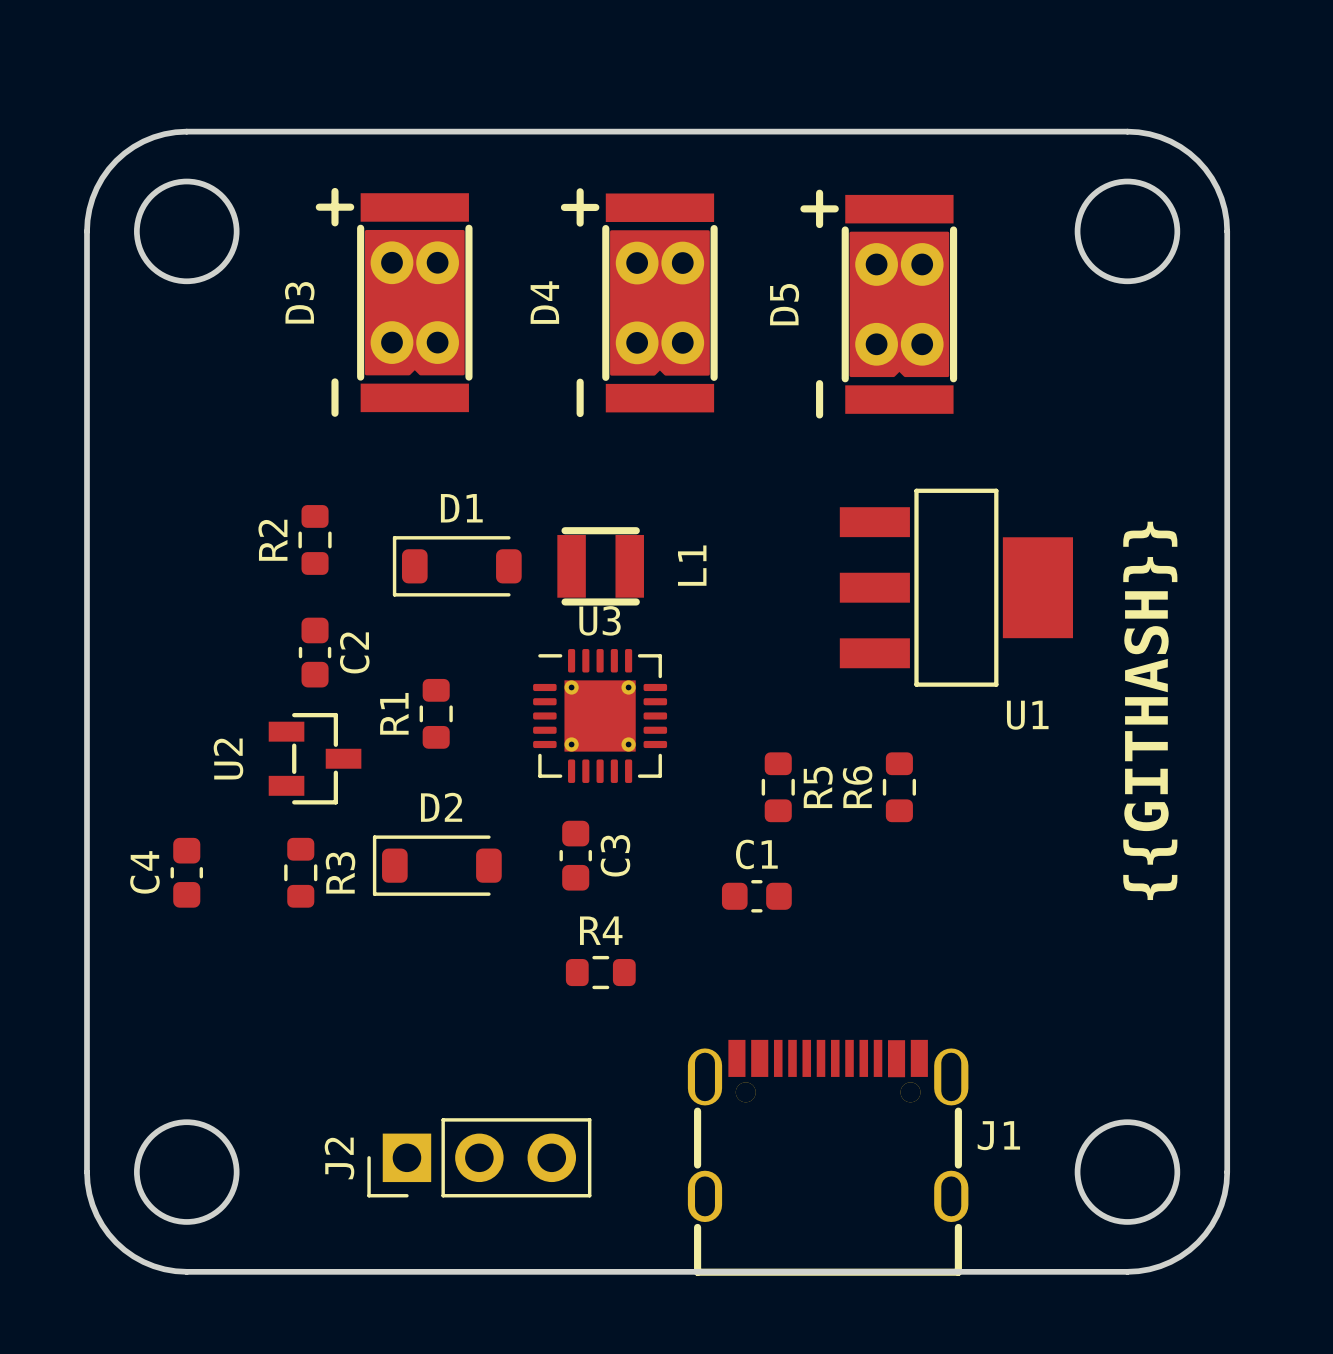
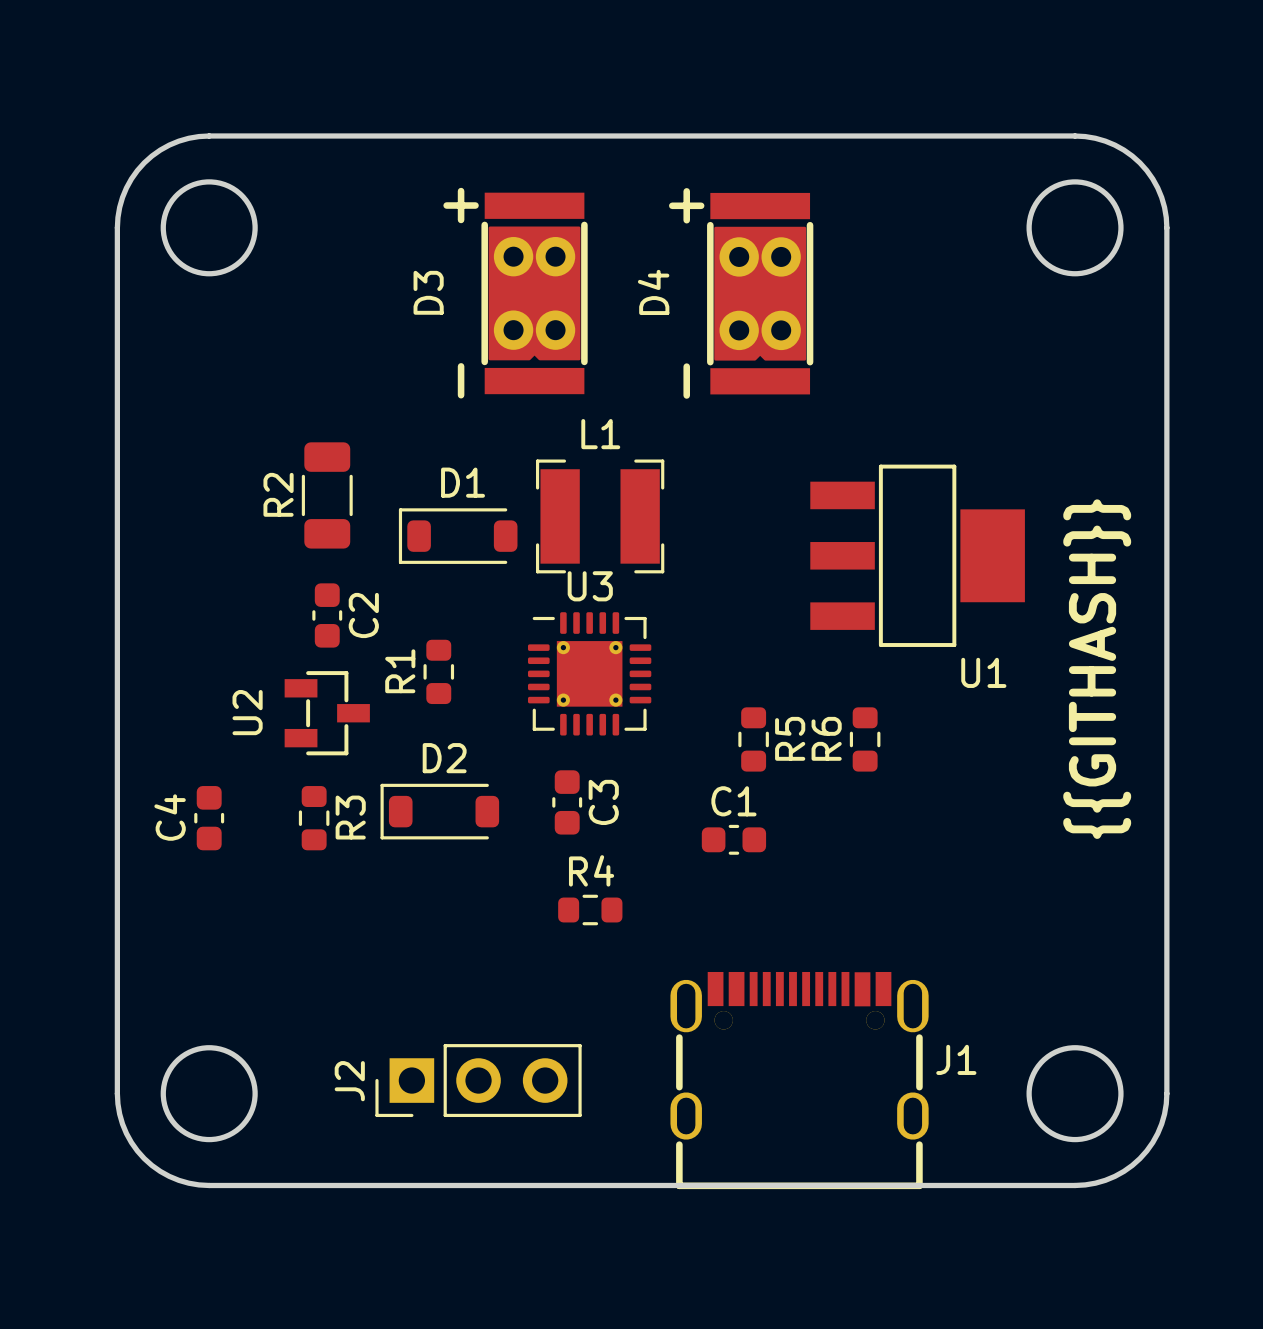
D3 position: (394, 302) -> (515, 293)
D4 position: (639, 302) -> (741, 293)
D5: (878, 304) -> none
R2 footprint: [298, 505, 332, 575] -> [301, 442, 353, 549]
L1 footprint: [557, 527, 644, 606] -> [535, 459, 665, 574]
L1 name position: L1 (692, 565) -> L1 (600, 434)

